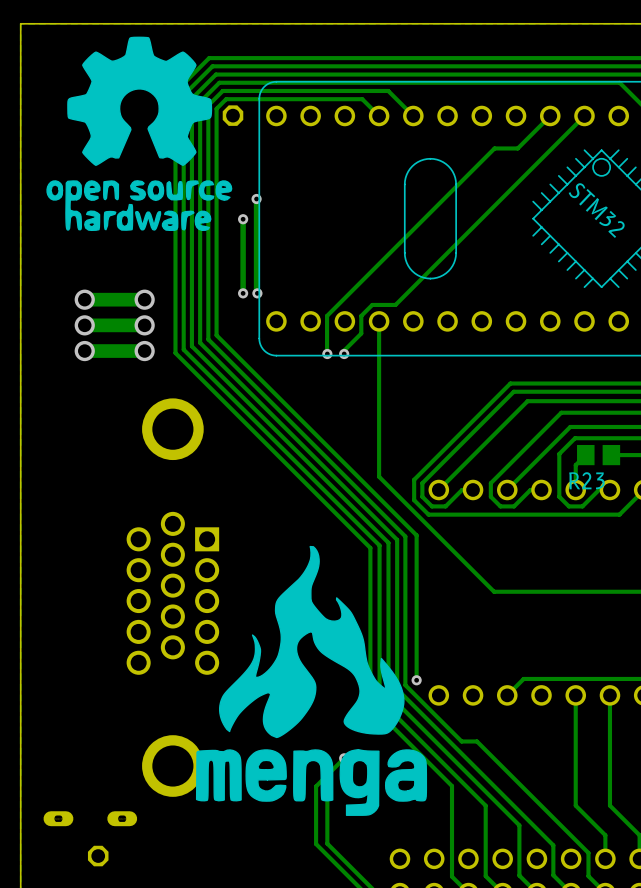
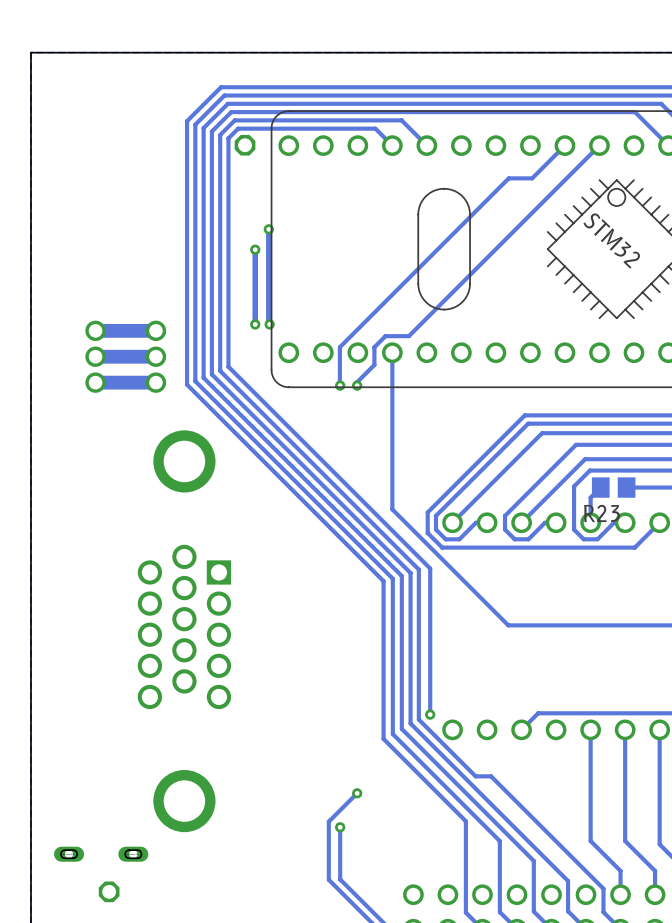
drawing: [46, 36, 233, 232] -> none
drawing: [195, 545, 428, 816] -> none

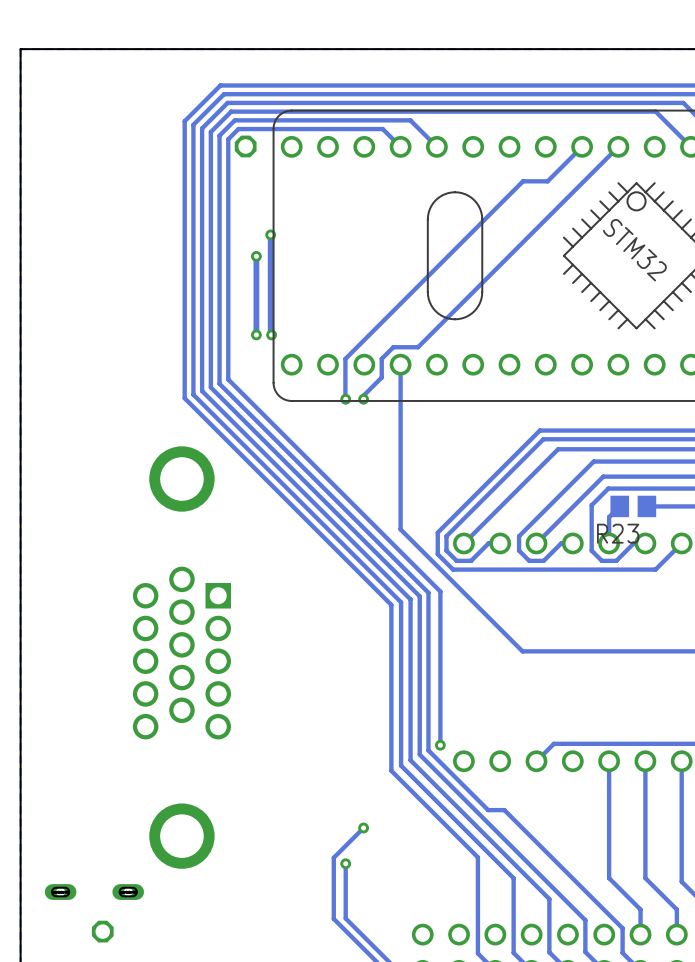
via: (95, 330) -> none
track: (155, 330) (95, 330) -> none
via: (155, 330) -> none
via: (95, 356) -> none
track: (155, 356) (95, 356) -> none
via: (155, 356) -> none
via: (95, 382) -> none
track: (155, 382) (95, 382) -> none
via: (155, 382) -> none

